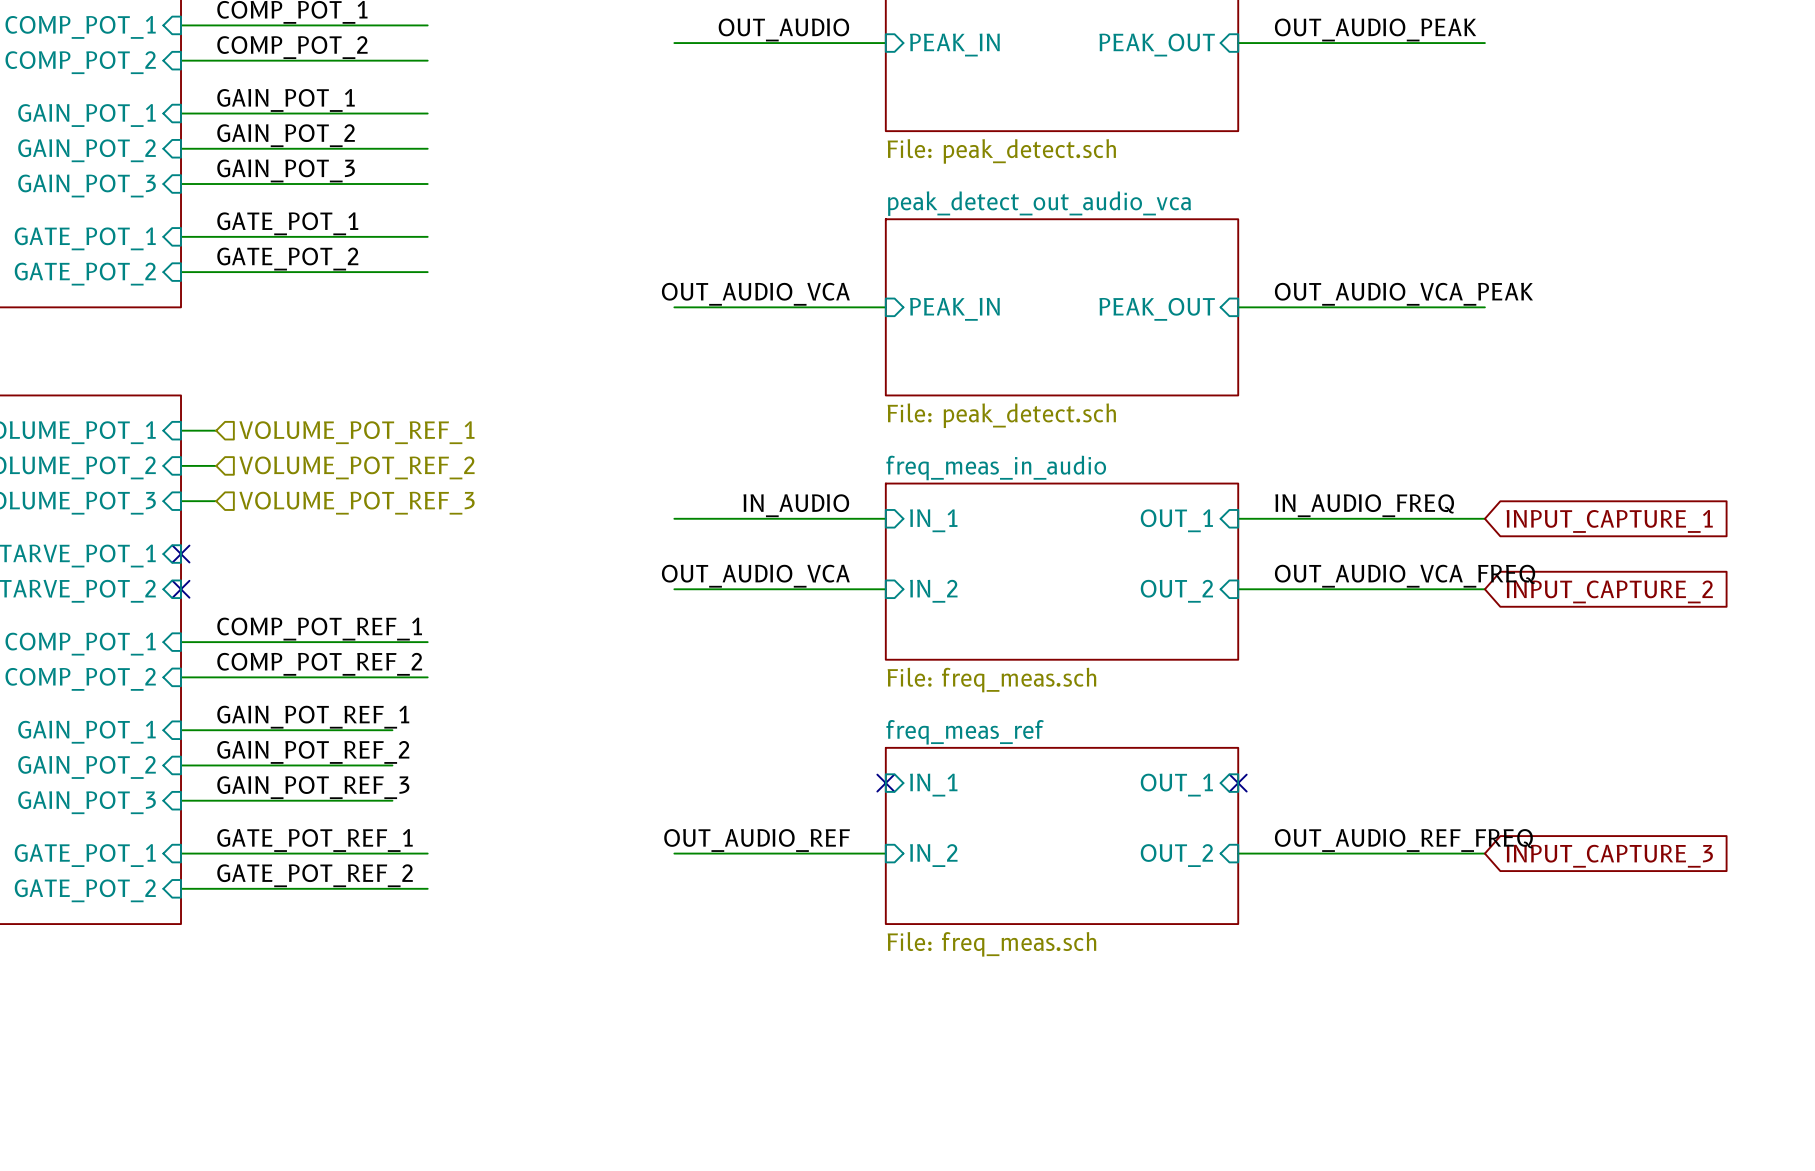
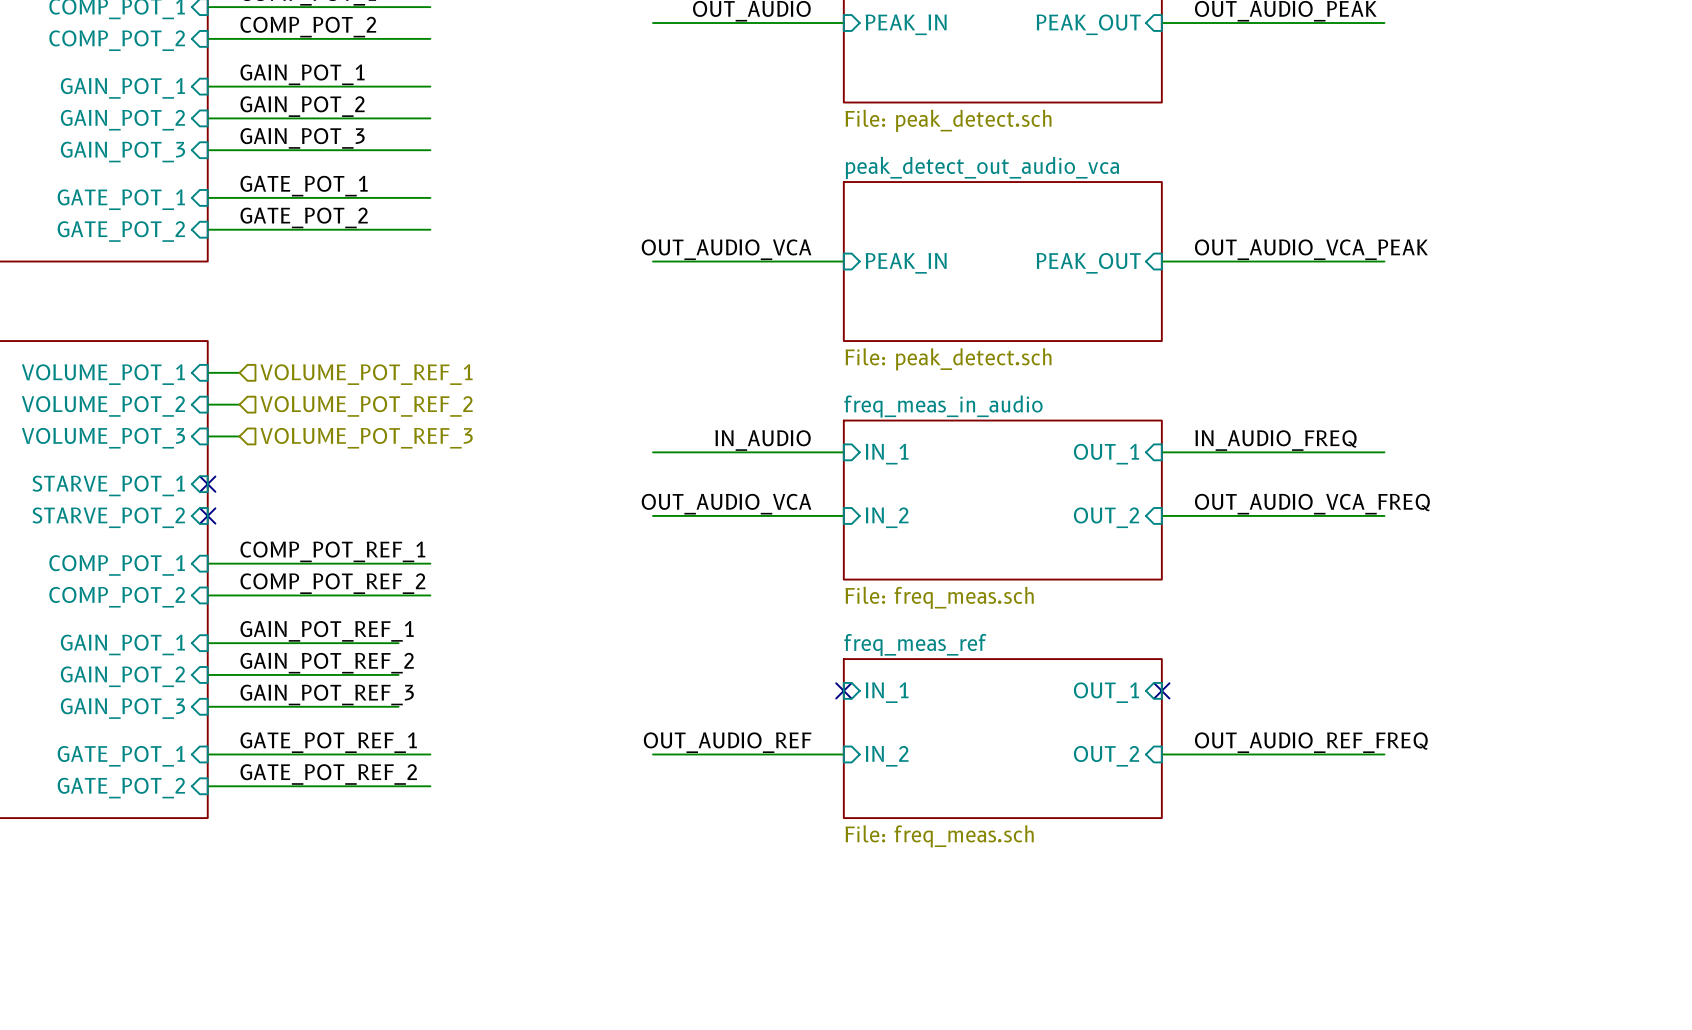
global label: INPUT_CAPTURE_1 (1609, 521) -> none
global label: INPUT_CAPTURE_2 (1609, 591) -> none
global label: INPUT_CAPTURE_3 (1609, 856) -> none

